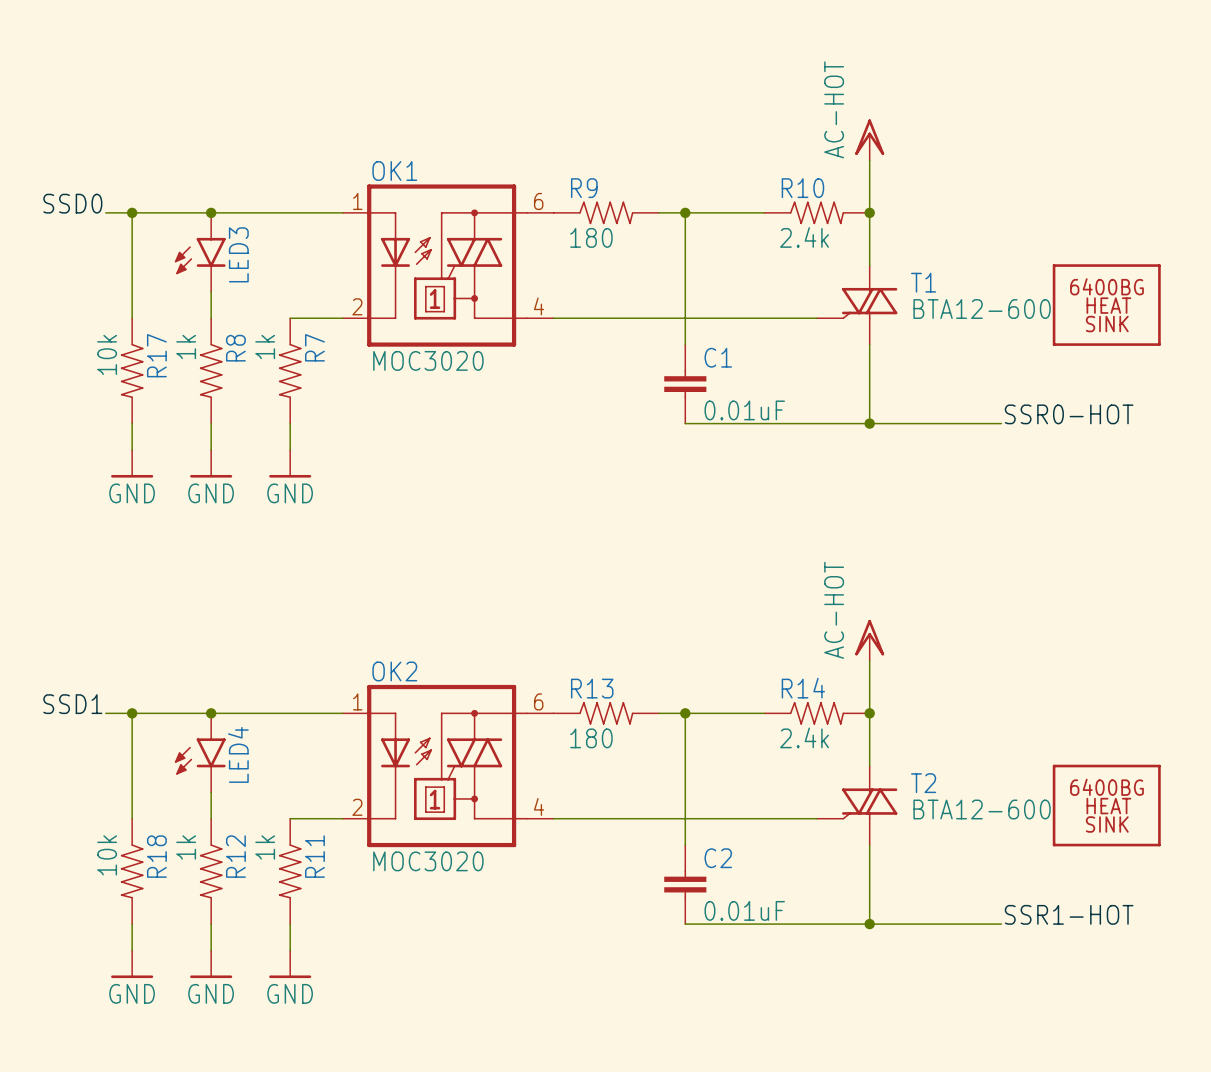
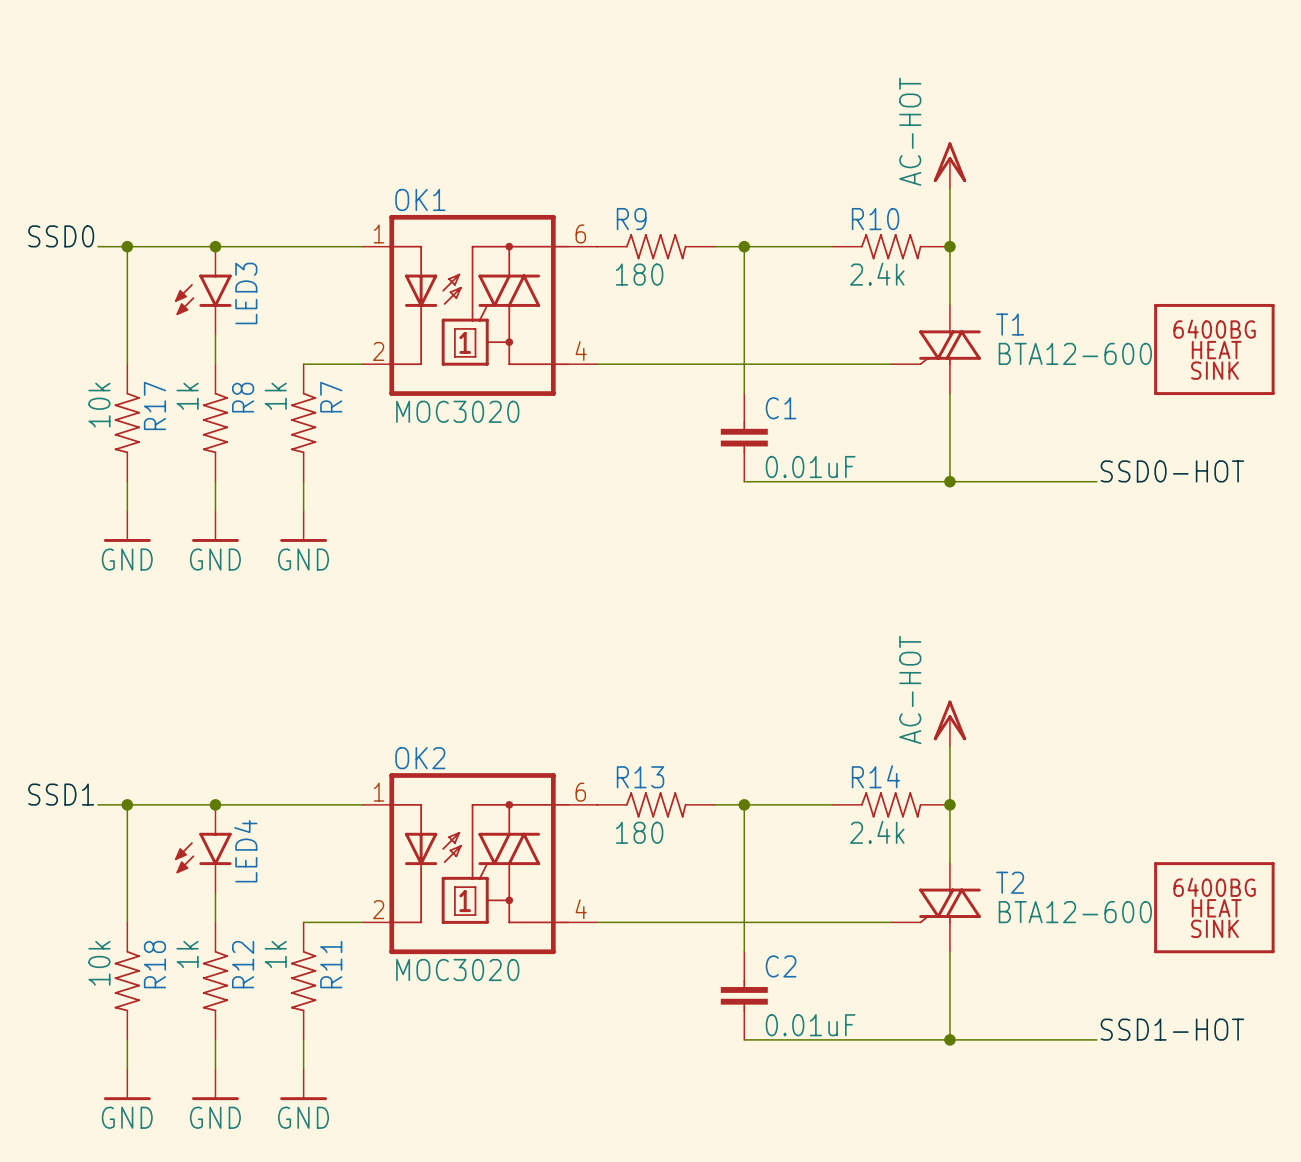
label: SSR0-HOT (1069, 414) -> SSD0-HOT (1172, 471)
label: SSR1-HOT (1069, 914) -> SSD1-HOT (1172, 1029)

